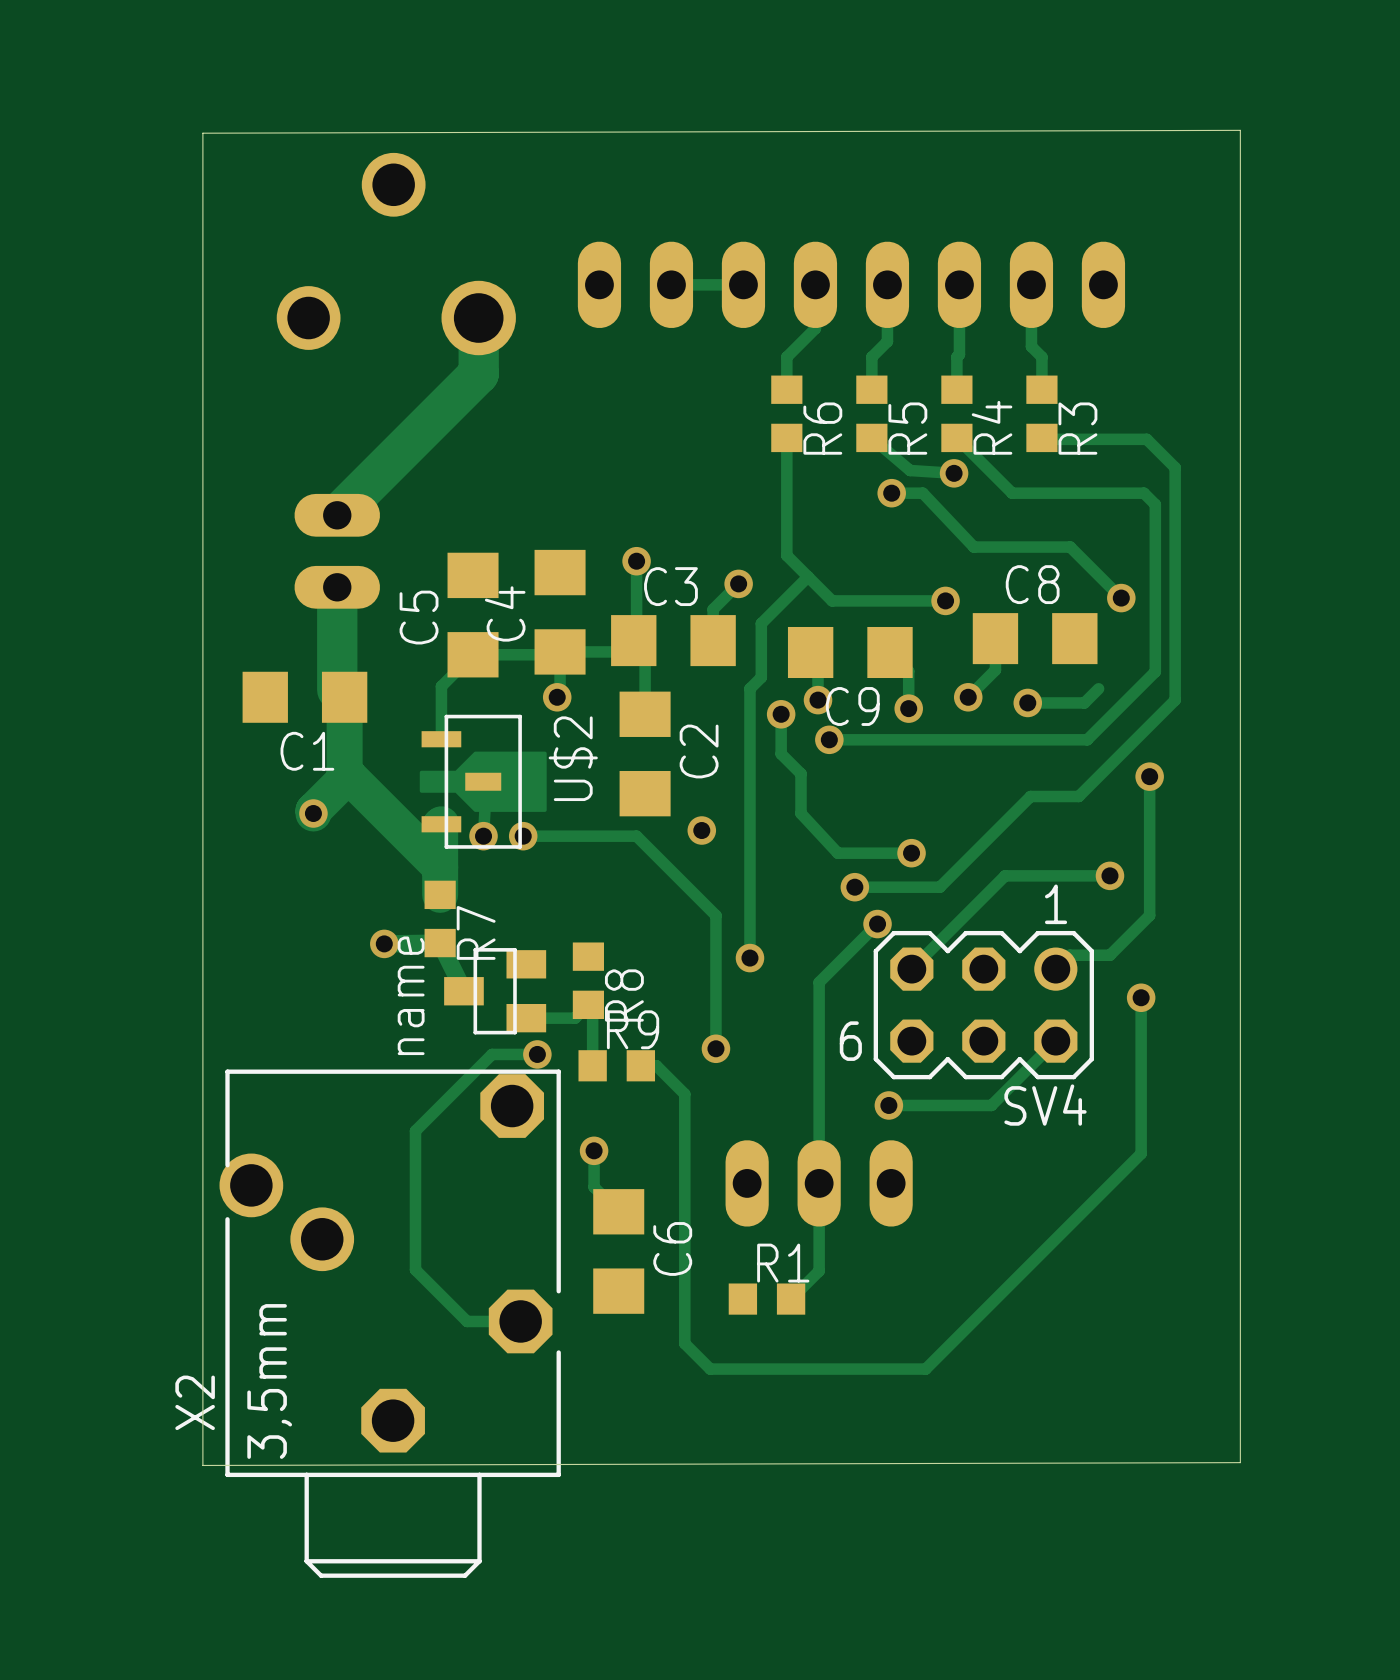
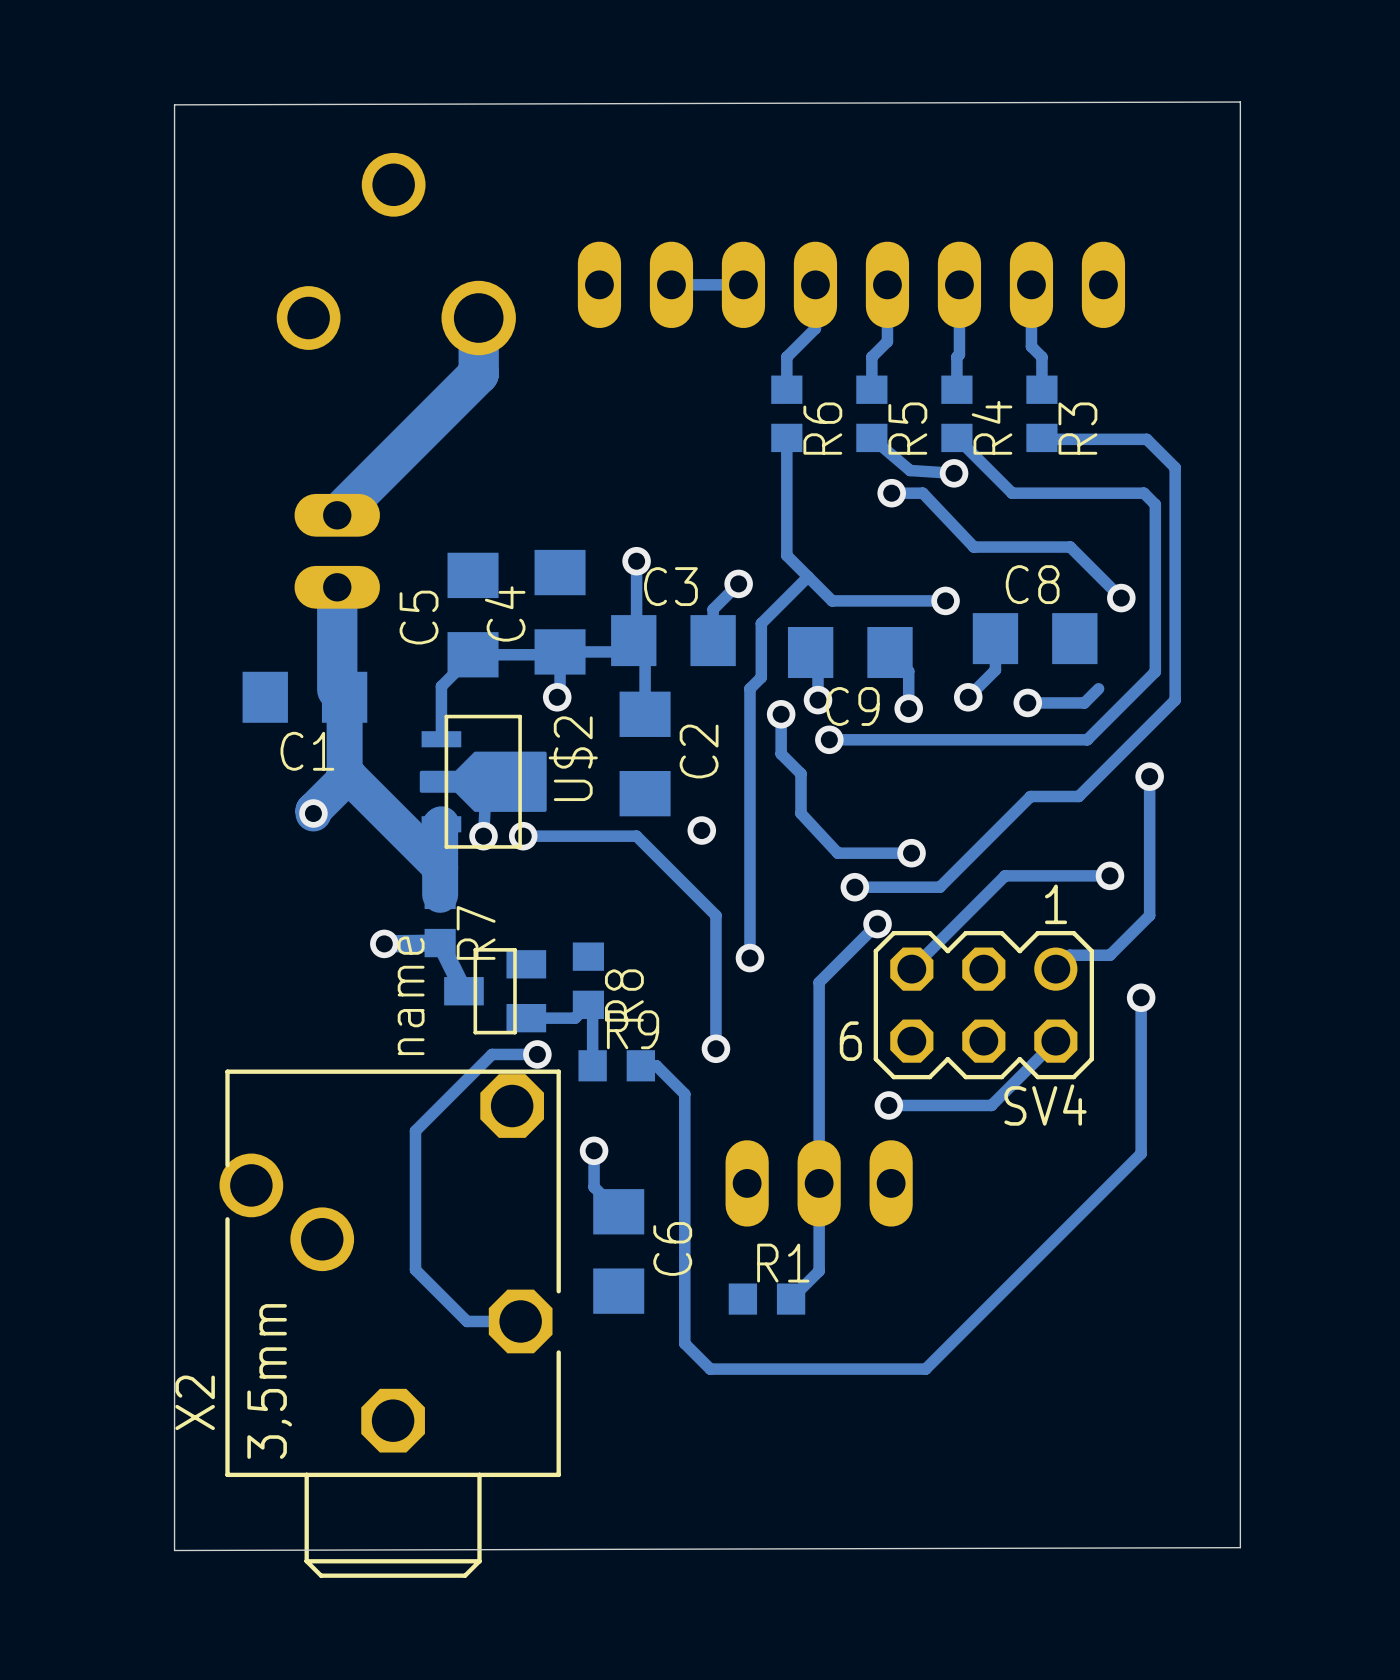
board edge: (1240, 130) (202, 133) (202, 1465) (1240, 1462) -> (1240, 130) (1240, 102) (174, 104) (174, 1550) (1240, 1547) (1240, 1462)

